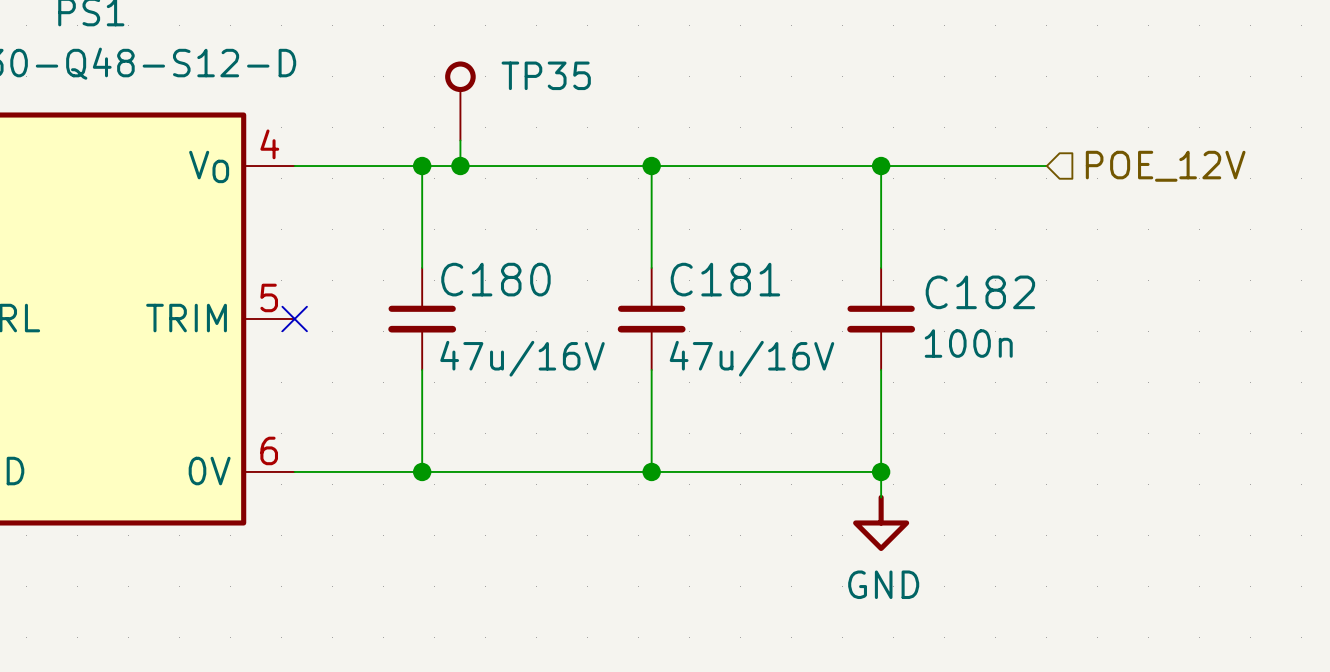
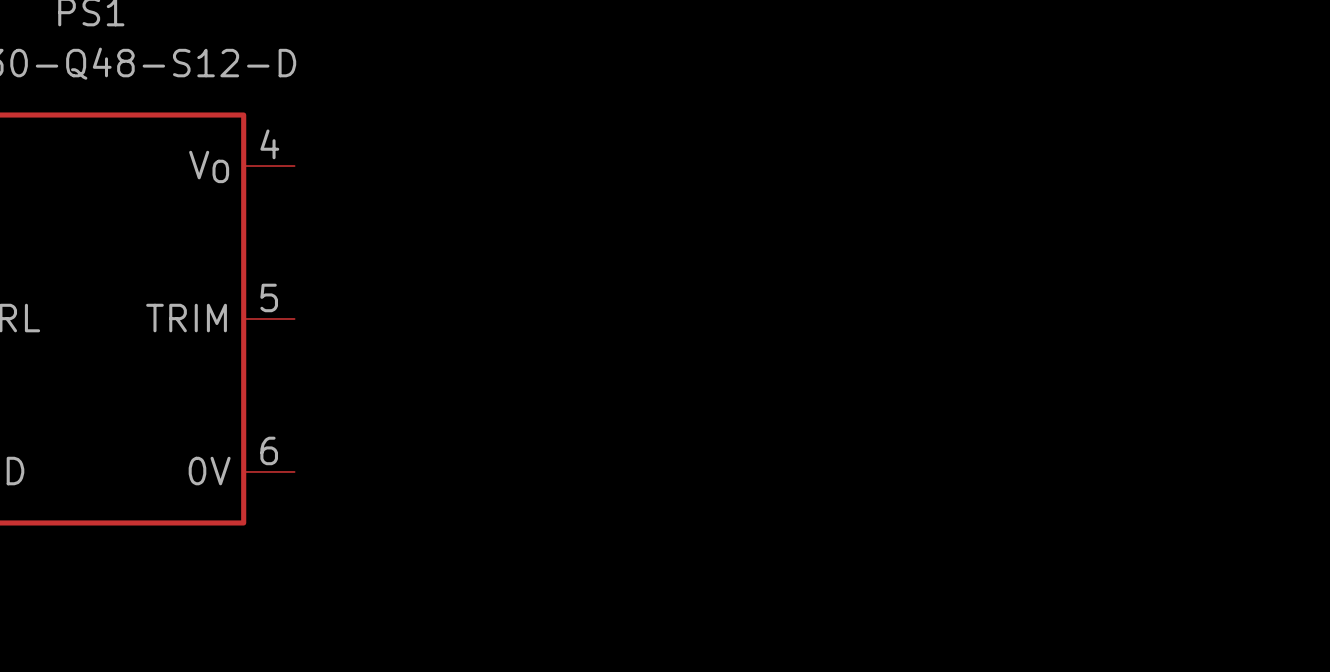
TP35: (460, 100) -> none
wire: (460, 140) (460, 166) -> none
wire: (294, 166) (1046, 166) -> none
wire: (422, 166) (422, 268) -> none
junction: (422, 166) -> none
junction: (460, 166) -> none
wire: (651, 166) (651, 268) -> none
junction: (651, 166) -> none
wire: (881, 166) (881, 268) -> none
junction: (881, 166) -> none
hierarchical label: POE_12V (1165, 166) -> none
no-connect mark: (294, 318) -> none
C180: (422, 318) -> none
C181: (651, 318) -> none
C182: (881, 318) -> none
wire: (422, 369) (422, 471) -> none
wire: (651, 369) (651, 471) -> none
wire: (881, 369) (881, 497) -> none
wire: (294, 471) (881, 471) -> none
junction: (422, 471) -> none
junction: (651, 471) -> none
junction: (881, 471) -> none
power symbol: GND (881, 522) -> none

